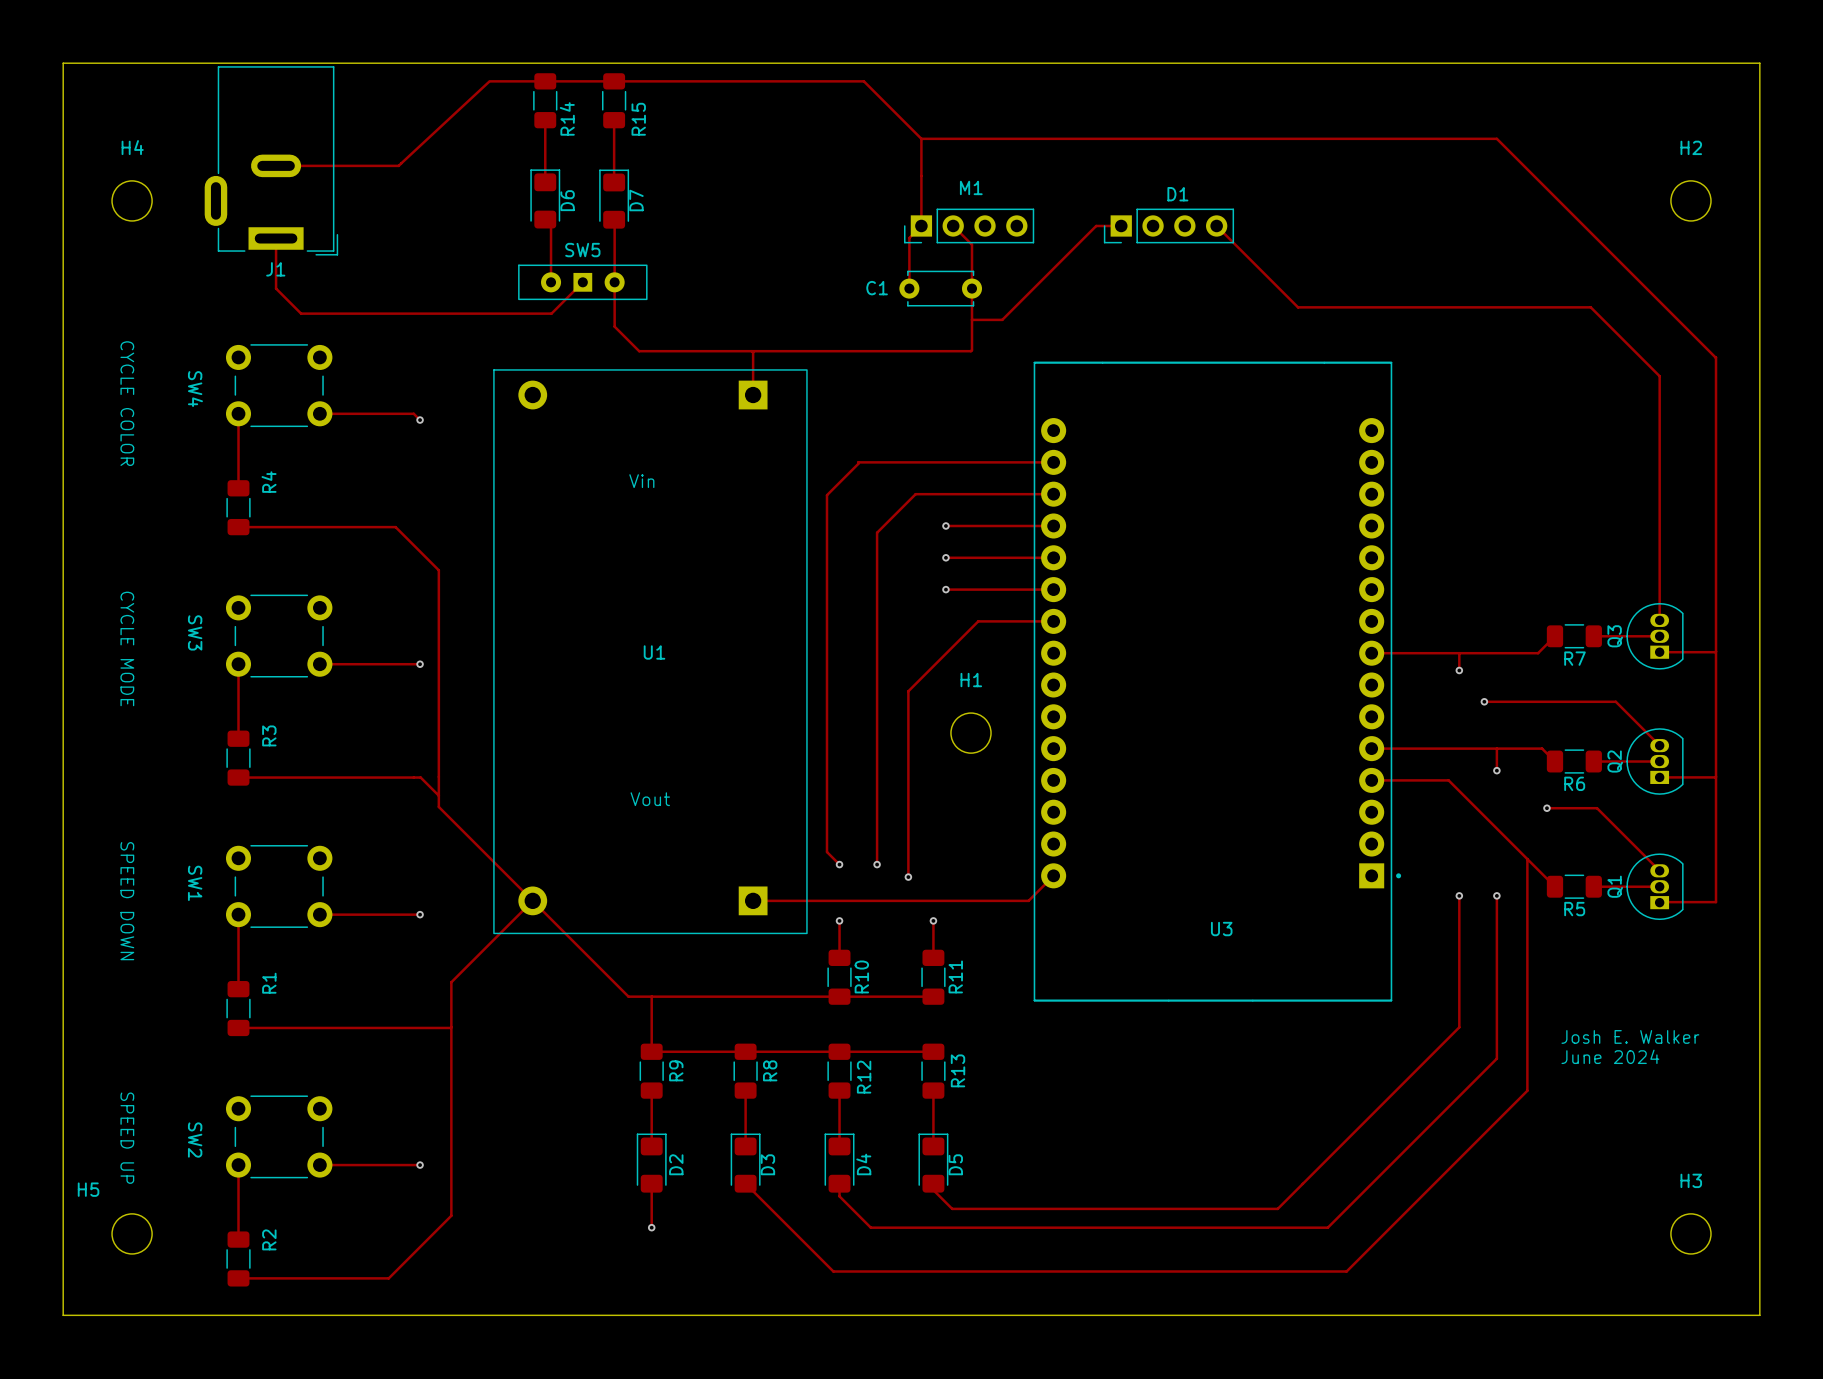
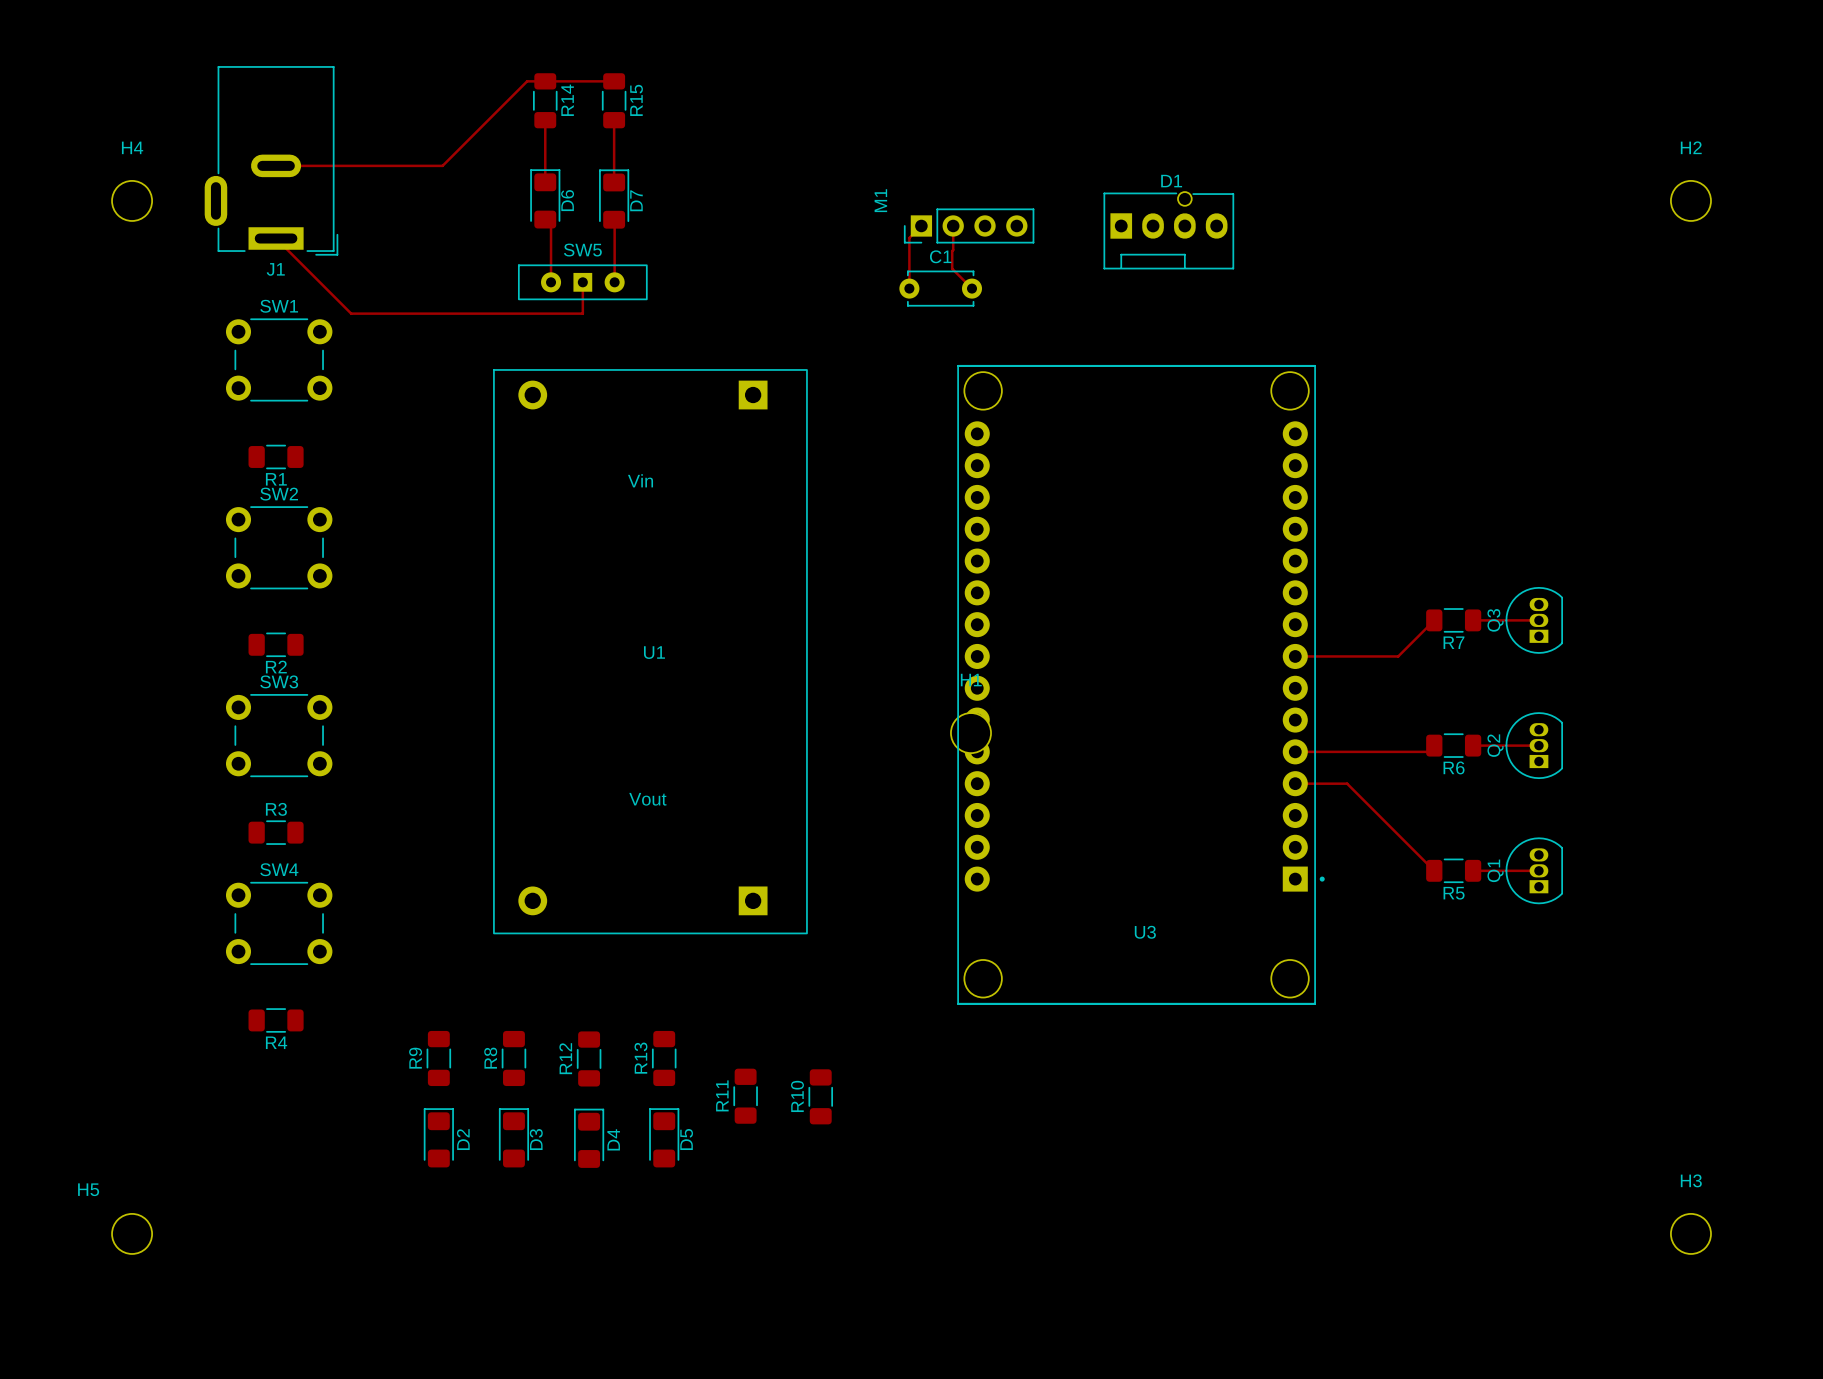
board edge: (63, 63) (1759, 63) (1759, 1315) (63, 1315) (63, 63) -> none
track: (488, 81) (398, 165) -> (527, 81) (442, 165) (398, 165)
track: (489, 81) (527, 81) -> none
track: (614, 81) (863, 81) (921, 138) -> none
R14 name position: R14 (567, 118) -> R14 (567, 100)
R15 name position: R15 (638, 119) -> R15 (636, 100)
track: (921, 138) (921, 225) -> none
track: (921, 138) (1496, 138) (1716, 357) (1716, 902) (1659, 902) -> none
M1 name rotation: 0° (971, 187) -> 90° counterclockwise (880, 200)
M1 name position: M1 (971, 187) -> M1 (880, 200)
D1 footprint: [1103, 208, 1235, 244] -> [1103, 192, 1235, 270]
track: (953, 225) (971, 244) (970, 351) (639, 351) (614, 326) (614, 282) -> (953, 225) (952, 268) (971, 288)
track: (1121, 225) (1096, 225) (1002, 319) (971, 319) -> none
track: (1216, 225) (1298, 307) (1590, 307) (1659, 376) (1659, 620) -> none
track: (276, 238) (276, 288) (301, 313) (351, 313) -> (276, 238) (351, 313)
track: (582, 282) (551, 313) -> (582, 282) (582, 313) (551, 313)
C1 name position: C1 (877, 288) -> C1 (940, 256)
track: (751, 351) (753, 395) -> none
U3 footprint: [1033, 361, 1402, 1002] -> [957, 365, 1325, 1005]
SW4 position: (279, 385) -> (279, 923)
SW4 name rotation: 0° (195, 389) -> 90° counterclockwise (279, 869)
SW4 name position: SW4 (195, 389) -> SW4 (279, 869)
text: CYCLE COLOR (127, 403) -> none
track: (238, 413) (238, 488) -> none
track: (319, 413) (413, 413) (420, 420) -> none
via: (420, 420) -> none
track: (1053, 462) (858, 462) (827, 495) (827, 852) (839, 864) -> none
R4 name position: R4 (269, 482) -> R4 (276, 1042)
track: (1053, 494) (915, 494) (877, 532) (877, 864) -> none
R4 rotation: 0° (238, 507) -> 90° clockwise (276, 1020)
R4 position: (238, 507) -> (276, 1020)
track: (945, 525) (1053, 525) -> none
via: (945, 525) -> none
track: (238, 527) (395, 527) (438, 570) (438, 806) (628, 996) (933, 996) -> none
track: (945, 557) (1053, 557) -> none
via: (945, 557) -> none
track: (945, 589) (1053, 589) -> none
via: (945, 589) -> none
track: none -> (1434, 620) (1398, 656) (1295, 656)
track: (1053, 621) (978, 621) (908, 691) (908, 877) -> none
SW3 name rotation: 0° (195, 632) -> 90° counterclockwise (279, 681)
SW3 name position: SW3 (195, 632) -> SW3 (279, 681)
SW3 position: (279, 636) -> (279, 735)
track: (1554, 636) (1538, 653) (1371, 653) -> none
R7 position: (1574, 636) -> (1453, 620)
track: (1593, 636) (1659, 636) -> (1473, 620) (1538, 620)
Q3 position: (1654, 636) -> (1534, 620)
text: CYCLE MODE (127, 648) -> none
track: (1716, 651) (1659, 652) -> none
track: (1459, 653) (1459, 670) -> none
track: (238, 664) (238, 738) -> none
track: (319, 664) (420, 664) -> none
via: (420, 664) -> none
via: (1459, 670) -> none
track: (1484, 701) (1615, 701) (1659, 745) -> none
via: (1484, 701) -> none
R3 name position: R3 (269, 735) -> R3 (276, 809)
track: none -> (1434, 745) (1428, 751) (1295, 751)
track: (1371, 748) (1542, 748) (1554, 761) (1548, 767) -> none
track: (1496, 748) (1496, 770) -> none
R3 rotation: 0° (238, 758) -> 90° clockwise (276, 832)
R3 position: (238, 758) -> (276, 832)
R6 position: (1574, 761) -> (1453, 745)
track: (1593, 761) (1659, 761) -> (1473, 745) (1538, 745)
Q2 position: (1654, 761) -> (1534, 745)
via: (1496, 770) -> none
track: (1716, 776) (1659, 777) -> none
track: (238, 777) (420, 777) (438, 795) -> none
track: (1371, 780) (1448, 780) (1554, 886) -> none
track: none -> (1295, 783) (1347, 783) (1434, 870)
track: (1546, 808) (1597, 808) (1659, 870) -> none
via: (1546, 808) -> none
track: (1527, 859) (1527, 1090) (1346, 1271) (833, 1271) (745, 1183) -> none
via: (839, 864) -> none
via: (877, 864) -> none
track: (1053, 875) (1028, 900) (753, 900) -> none
via: (908, 877) -> none
SW1 name rotation: 0° (195, 883) -> 90° counterclockwise (279, 306)
SW1 name position: SW1 (195, 883) -> SW1 (279, 306)
SW1 position: (279, 886) -> (279, 359)
R5 position: (1574, 886) -> (1453, 870)
track: (1593, 886) (1659, 886) -> (1473, 870) (1538, 870)
Q1 position: (1654, 886) -> (1534, 870)
track: (1459, 895) (1459, 1027) (1277, 1208) (952, 1208) (933, 1190) (933, 1183) -> none
via: (1459, 895) -> none
track: (1496, 895) (1496, 1058) (1327, 1227) (870, 1227) (839, 1196) (839, 1183) -> none
via: (1496, 895) -> none
track: (532, 900) (451, 982) (451, 1215) (388, 1278) (238, 1278) -> none
text: SPEED DOWN (127, 901) -> none
track: (238, 914) (238, 989) -> none
track: (319, 914) (420, 914) -> none
via: (420, 914) -> none
track: (839, 920) (839, 957) -> none
via: (839, 920) -> none
track: (933, 920) (933, 957) -> none
via: (933, 920) -> none
R10 name position: R10 (861, 976) -> R10 (797, 1096)
R11 name position: R11 (955, 976) -> R11 (722, 1095)
R10 position: (839, 977) -> (820, 1096)
R11 position: (933, 977) -> (745, 1096)
R1 name position: R1 (269, 983) -> R1 (276, 479)
track: (651, 996) (651, 1051) (933, 1051) -> none
R1 rotation: 0° (238, 1008) -> 90° clockwise (276, 457)
R1 position: (238, 1008) -> (276, 457)
track: (451, 1027) (238, 1027) -> none
text: Josh E. Walker (1630, 1036) -> none
text: June 2024 (1610, 1056) -> none
R9 name position: R9 (676, 1070) -> R9 (415, 1058)
R8 name position: R8 (770, 1070) -> R8 (490, 1058)
R13 name position: R13 (958, 1070) -> R13 (640, 1058)
R9 position: (651, 1071) -> (438, 1058)
R8 position: (745, 1071) -> (513, 1058)
R12 position: (839, 1071) -> (589, 1058)
R13 position: (933, 1071) -> (664, 1058)
R12 name position: R12 (864, 1077) -> R12 (565, 1058)
track: (651, 1090) (651, 1146) -> none
track: (745, 1090) (745, 1146) -> none
track: (839, 1090) (839, 1146) -> none
track: (933, 1090) (933, 1146) -> none
SW2 position: (279, 1136) -> (279, 547)
text: SPEED UP (127, 1138) -> none
SW2 name rotation: 0° (195, 1140) -> 90° counterclockwise (279, 494)
SW2 name position: SW2 (195, 1140) -> SW2 (279, 494)
D2 position: (651, 1163) -> (438, 1137)
D3 position: (745, 1163) -> (513, 1137)
D4 position: (839, 1163) -> (589, 1138)
D5 position: (933, 1163) -> (664, 1137)
track: (238, 1165) (238, 1239) -> none
track: (319, 1165) (420, 1165) -> none
via: (420, 1165) -> none
track: (651, 1183) (651, 1227) -> none
via: (651, 1227) -> none
R2 rotation: 0° (238, 1258) -> 90° clockwise (276, 644)
R2 position: (238, 1258) -> (276, 644)

